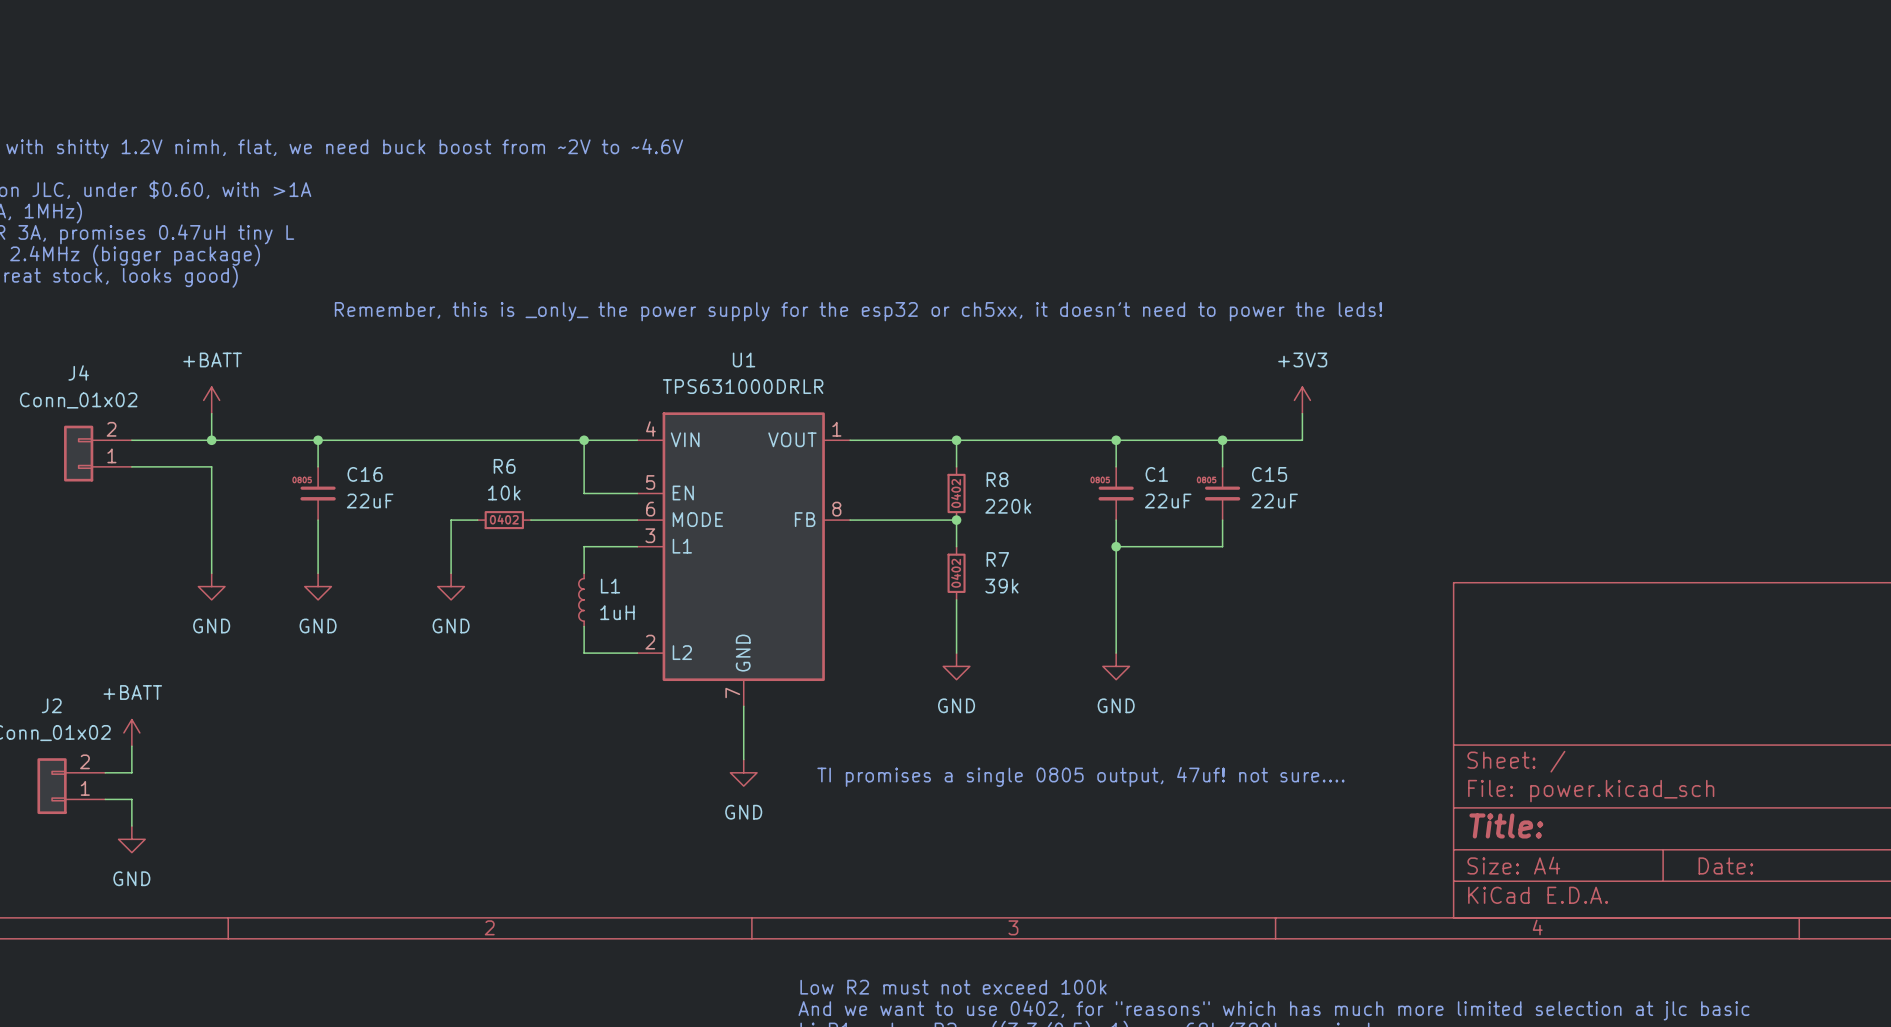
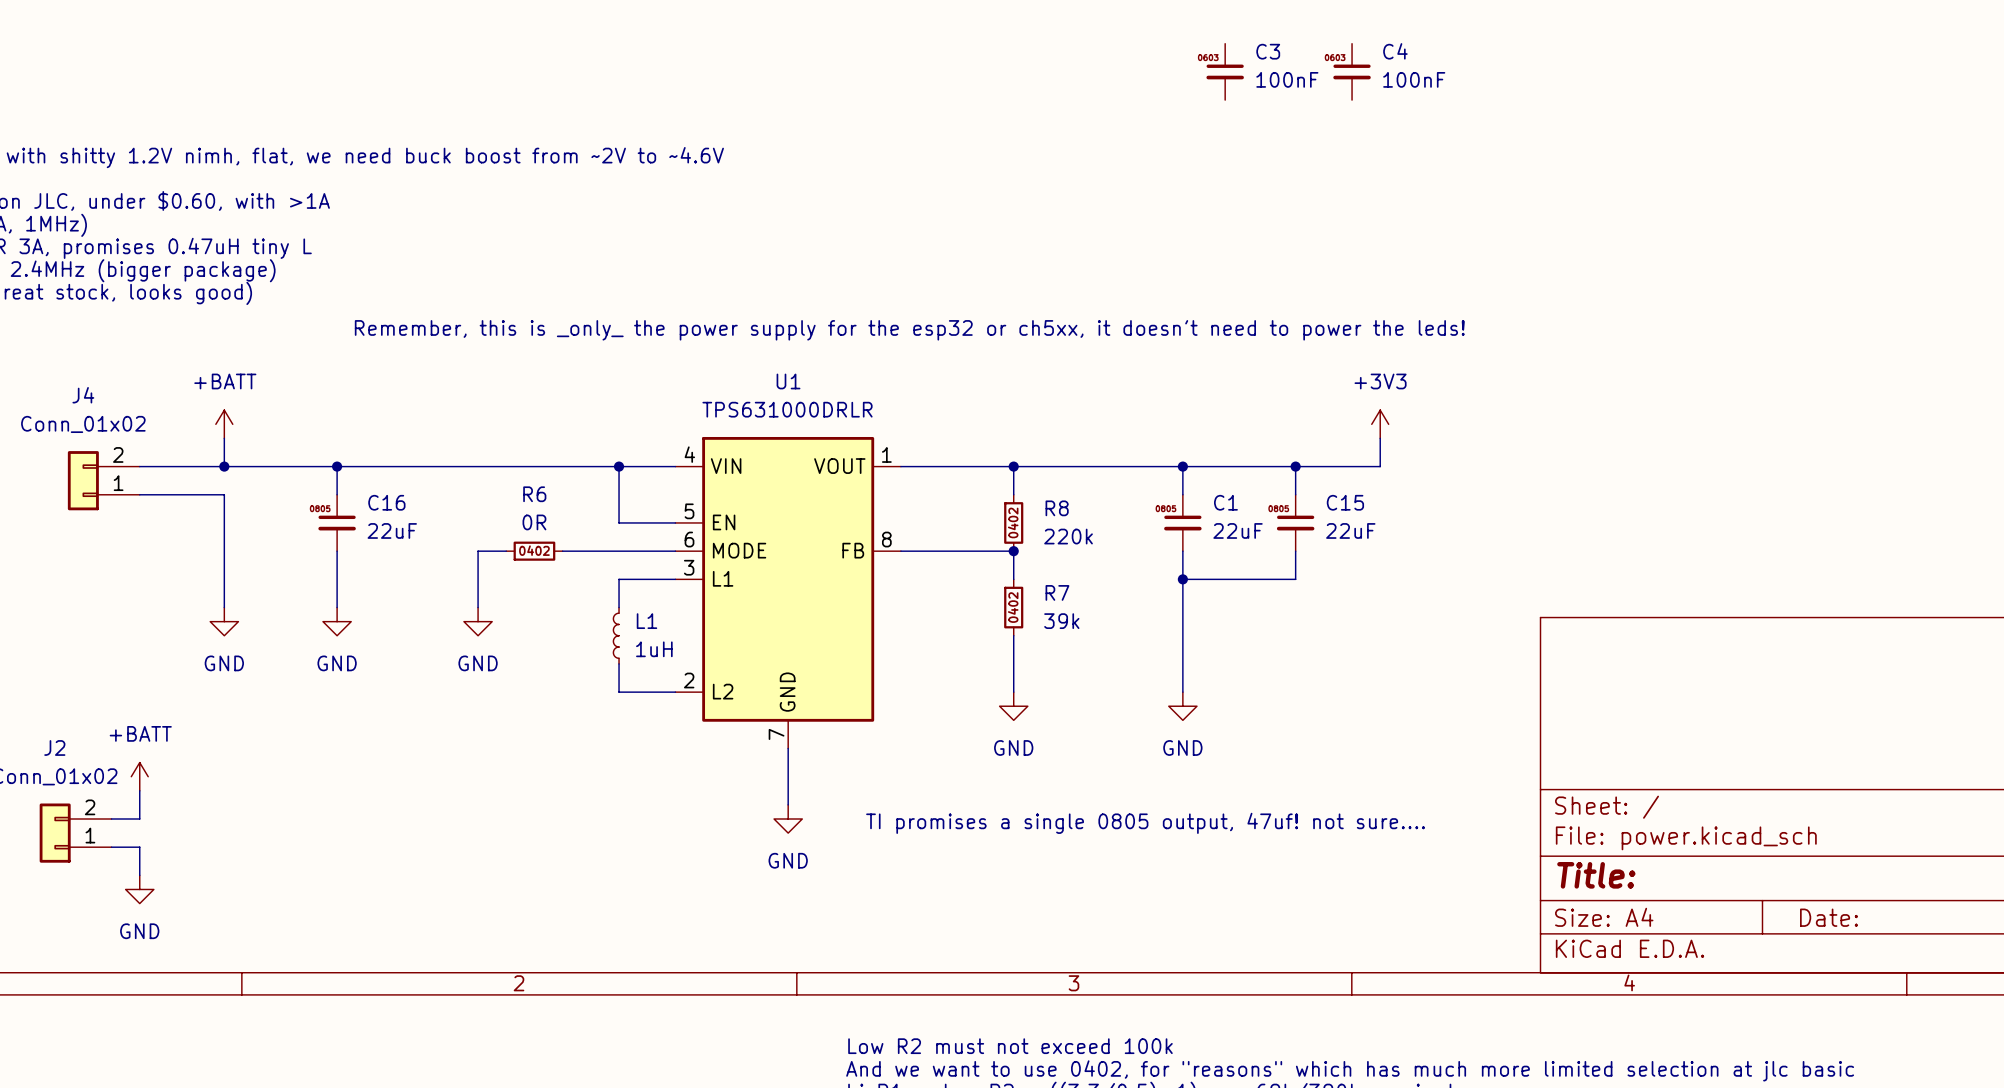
C3: none -> 100nF (1225, 71)
C4: none -> 100nF (1352, 71)
R6 value: 10k (504, 492) -> 0R (534, 522)

